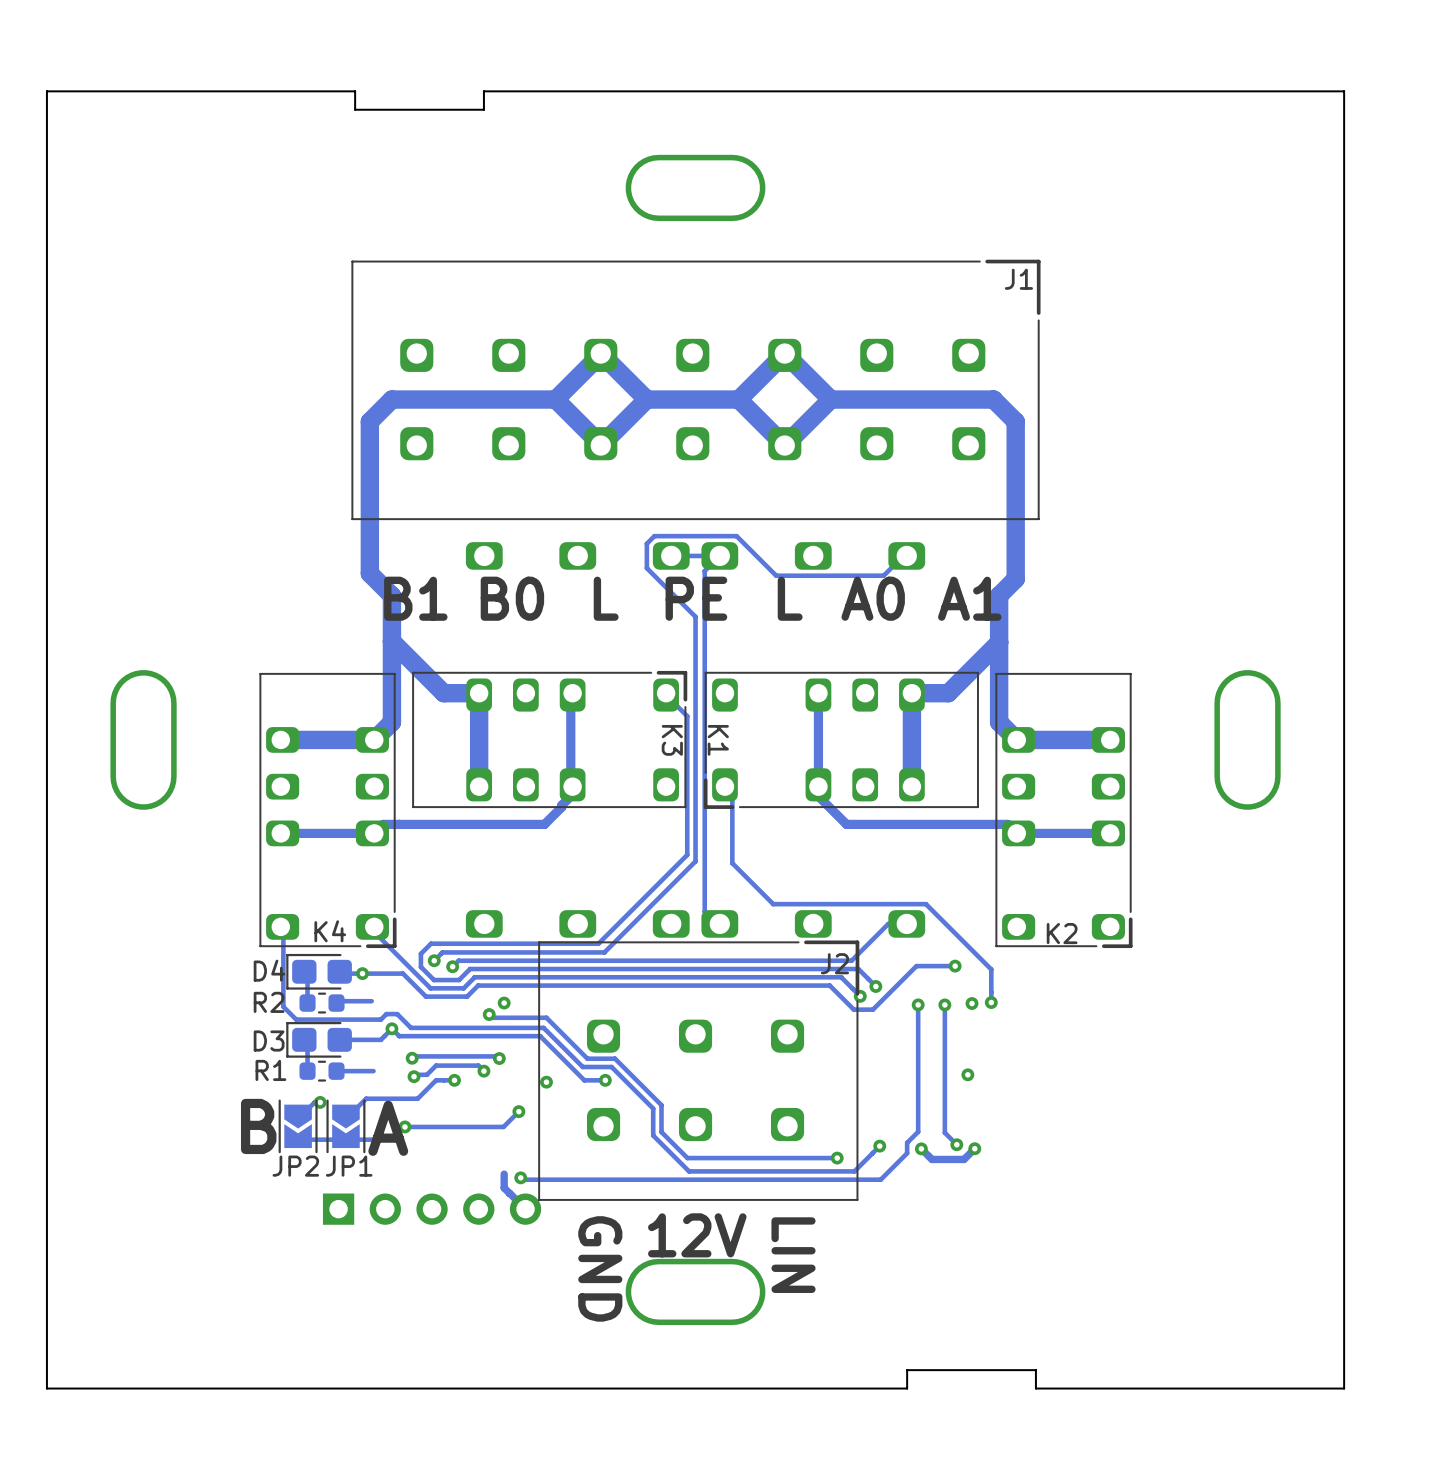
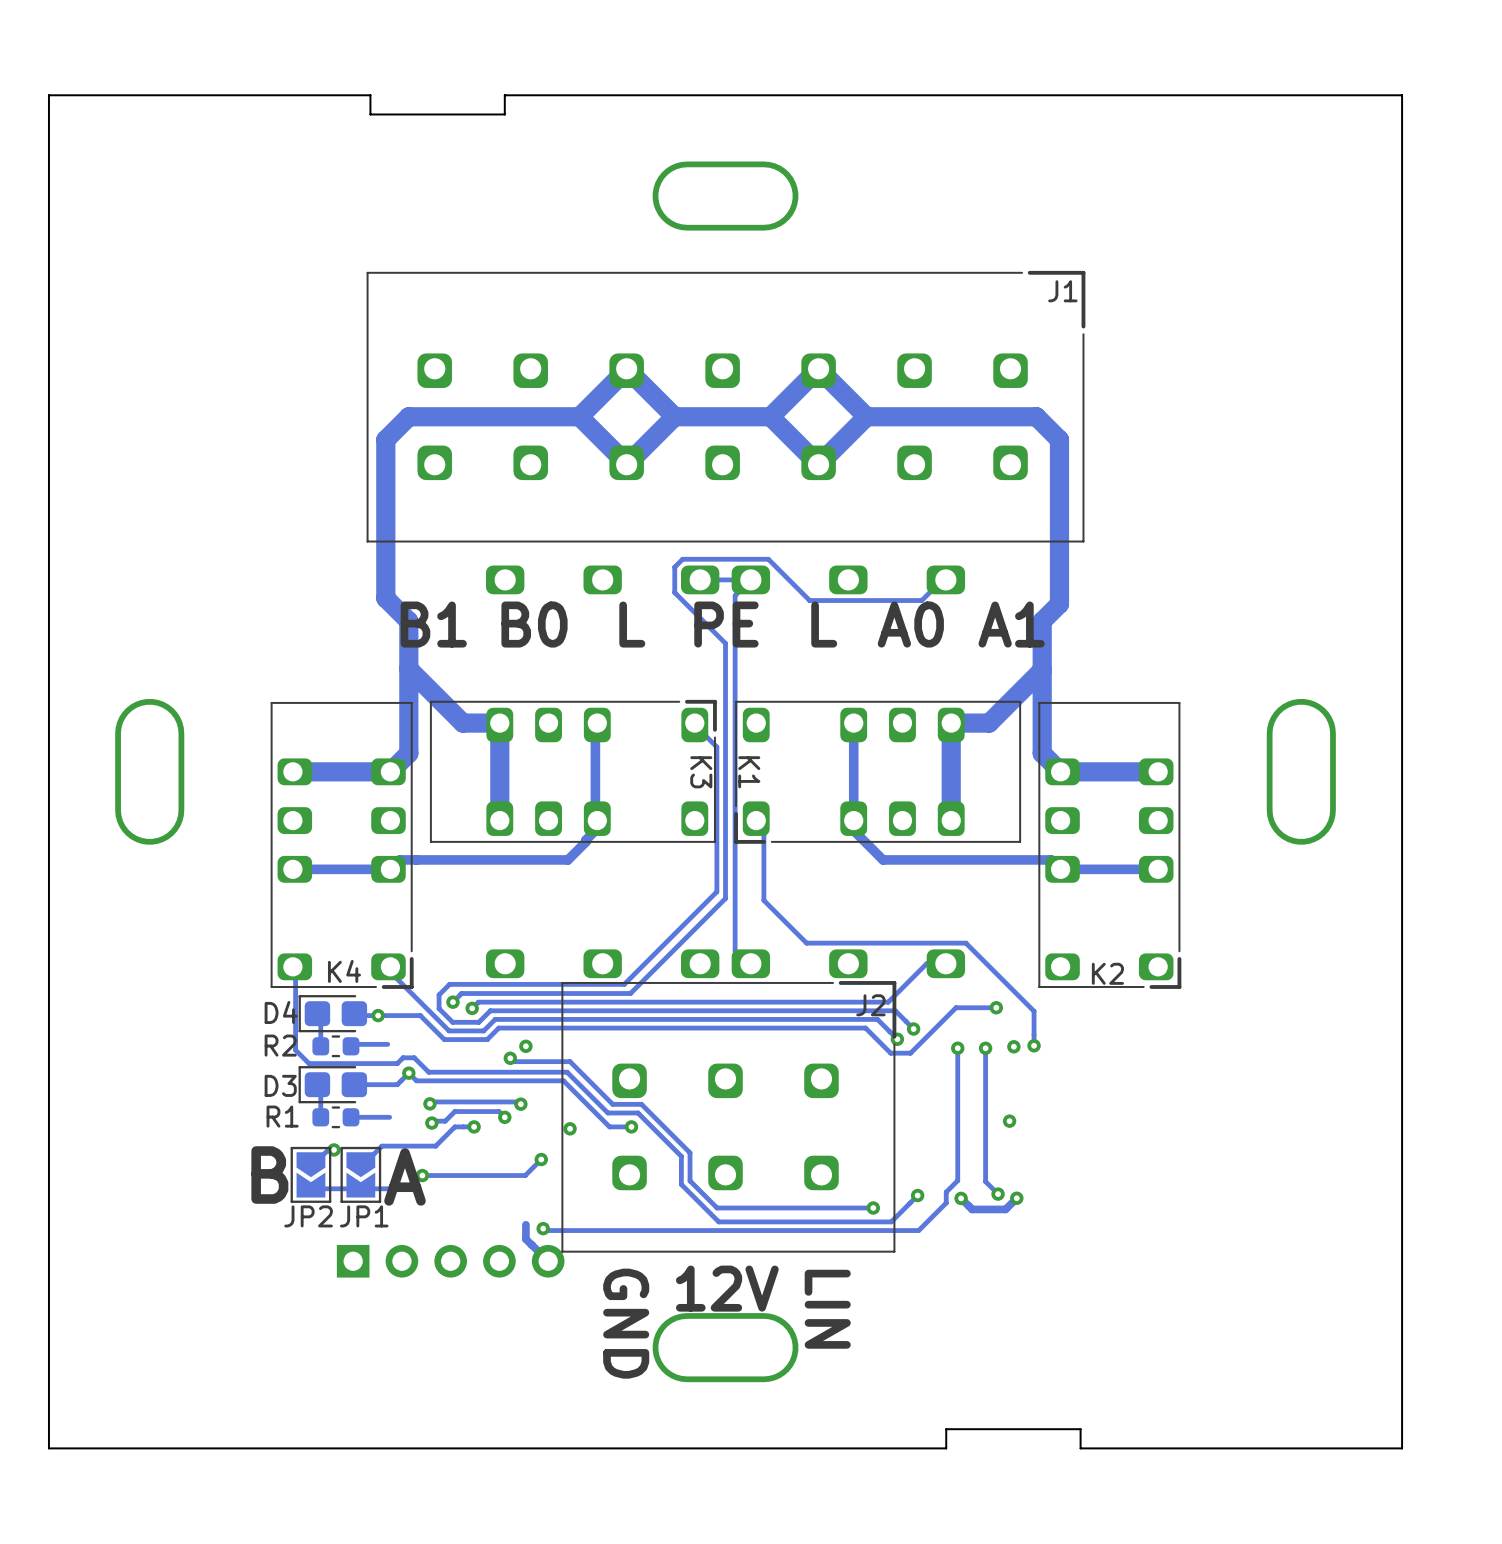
JP2 footprint: [278, 1099, 318, 1154] -> [290, 1146, 332, 1203]
JP1 footprint: [326, 1099, 366, 1154] -> [340, 1146, 382, 1203]

